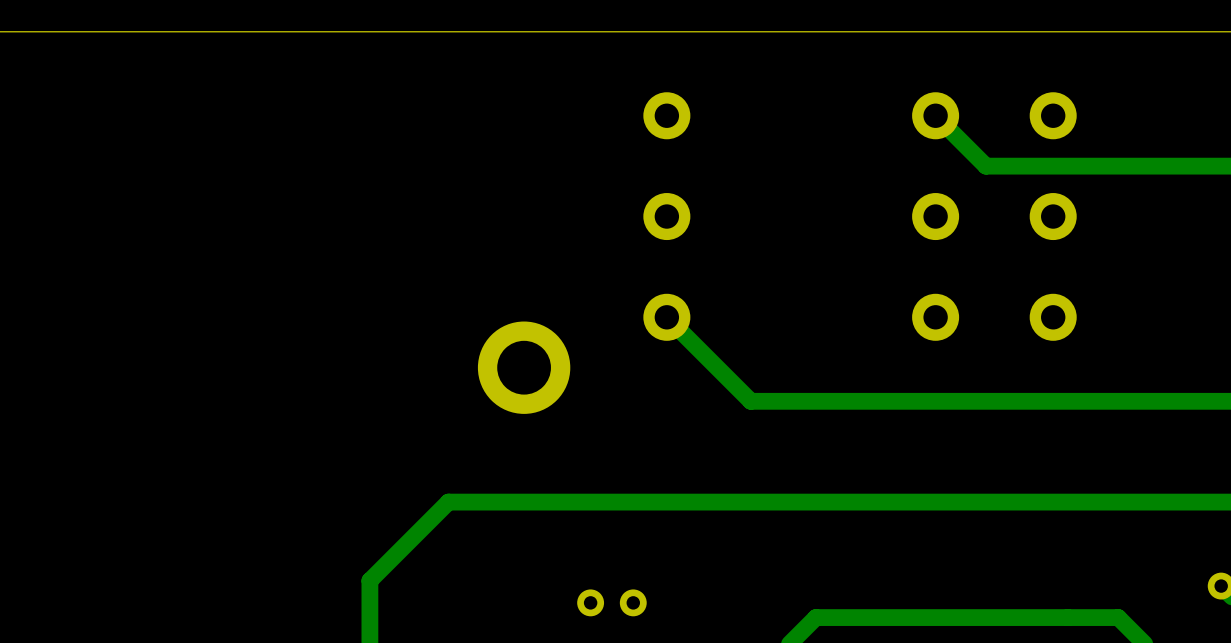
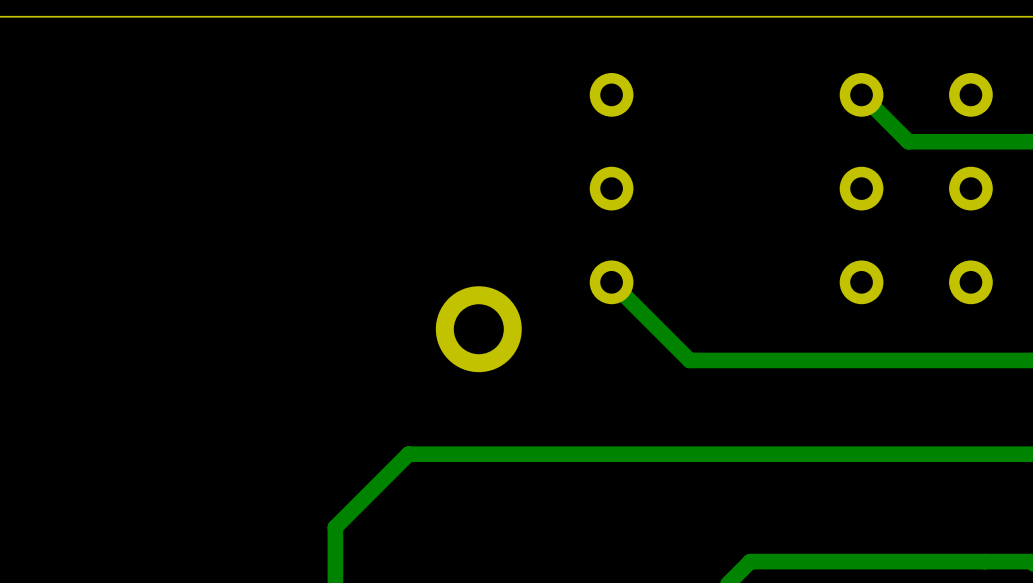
part: (611, 602) -> none

